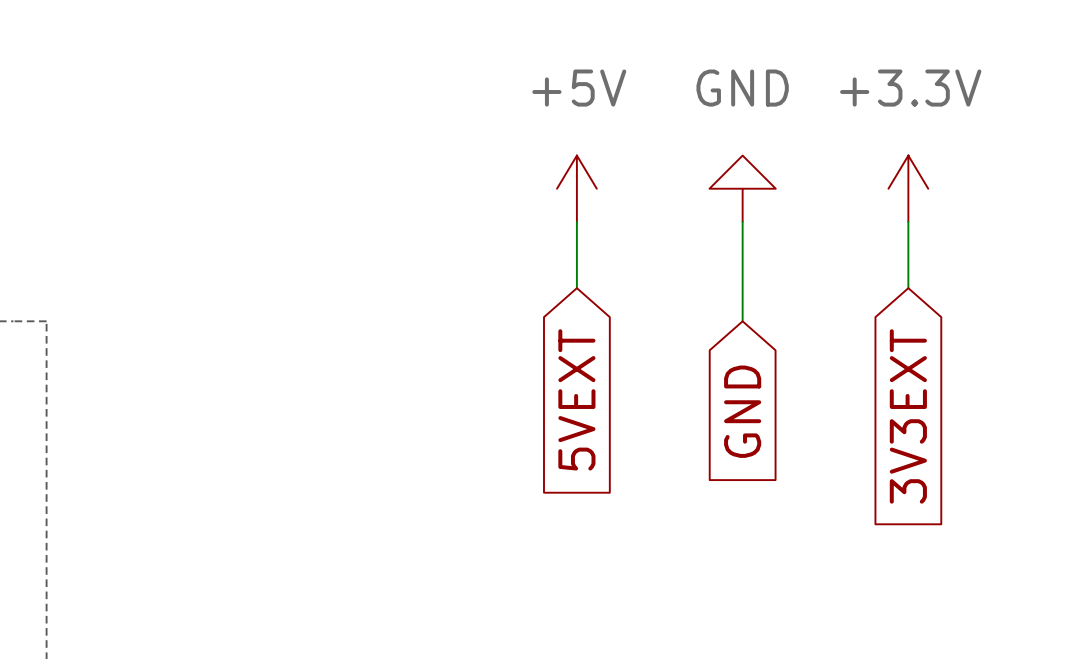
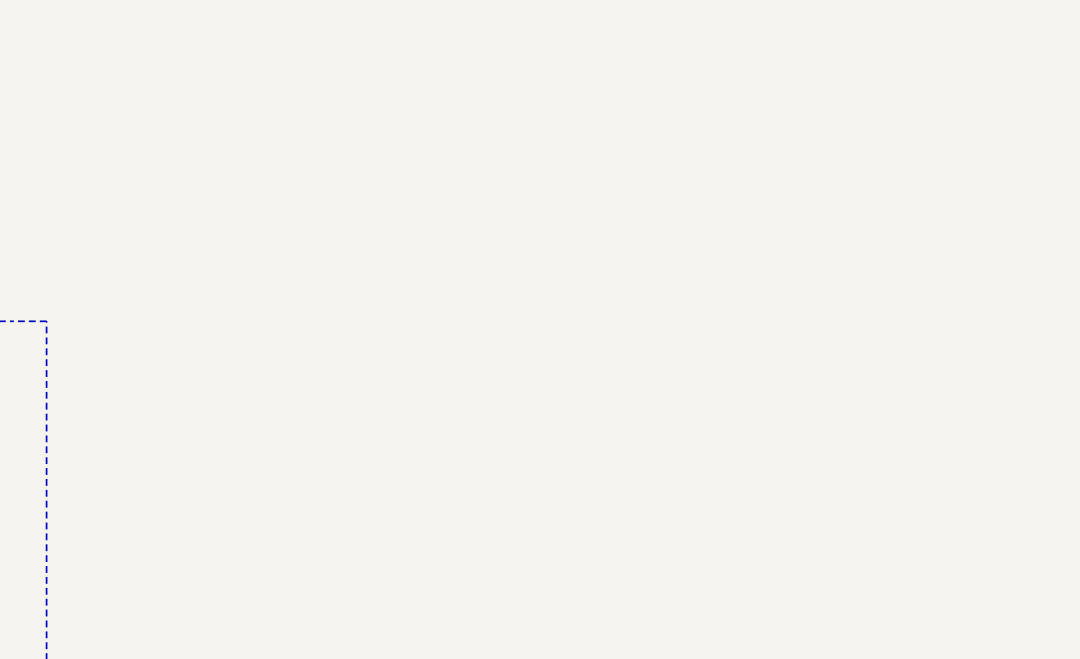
power symbol: +5V (576, 188) -> none
power symbol: GND (742, 188) -> none
power symbol: +3.3V (908, 188) -> none
wire: (576, 221) (576, 288) -> none
wire: (742, 221) (742, 321) -> none
wire: (908, 221) (908, 288) -> none
global label: 5VEXT (576, 399) -> none
global label: GND (742, 411) -> none
global label: 3V3EXT (908, 416) -> none

